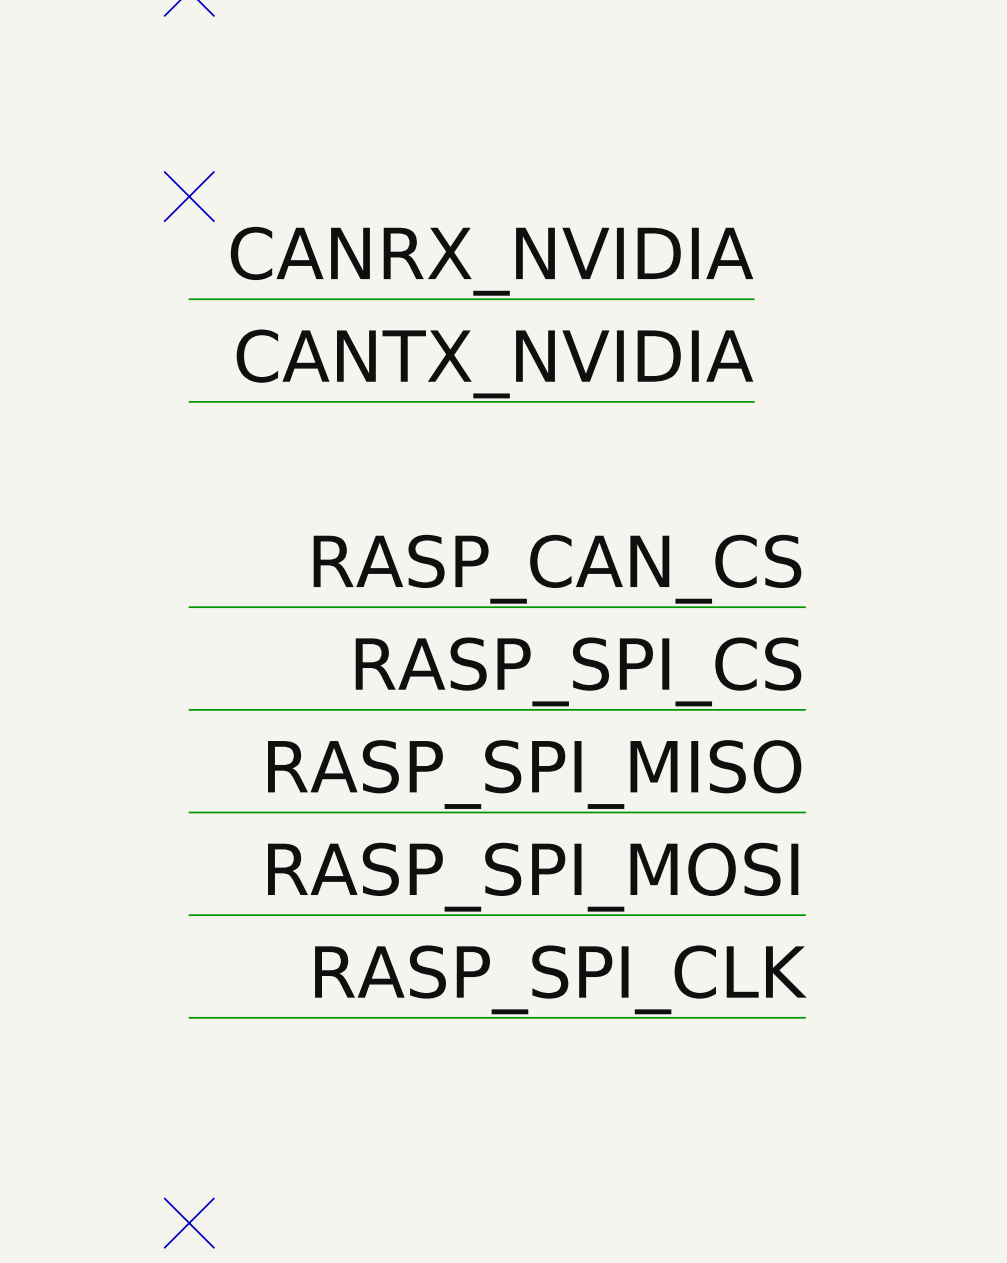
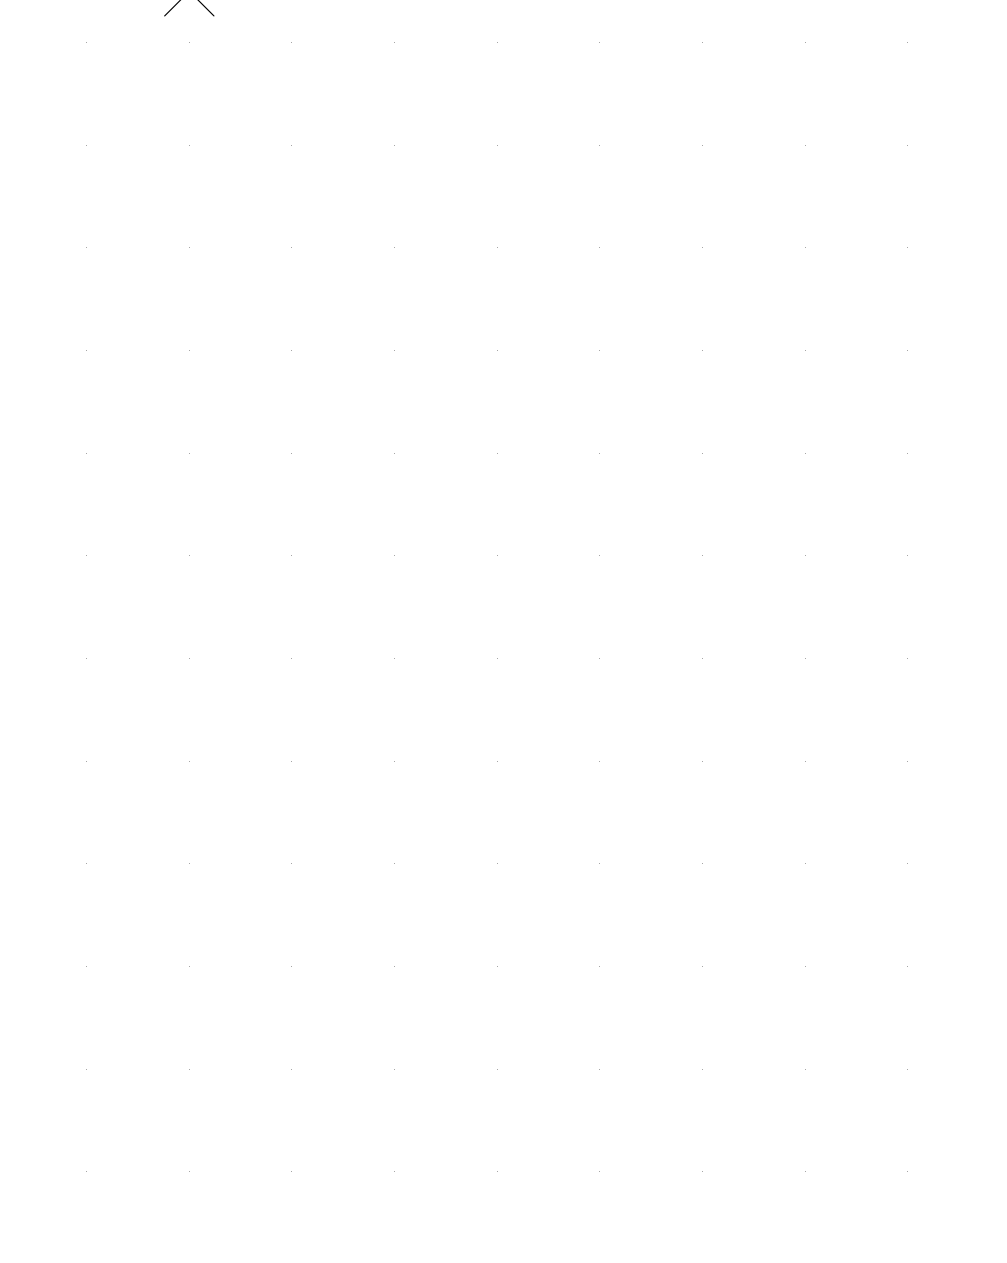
no-connect mark: (189, 196) -> none
label: CANRX_NVIDIA (492, 261) -> none
wire: (189, 299) (753, 299) -> none
label: CANTX_NVIDIA (495, 363) -> none
wire: (189, 401) (753, 401) -> none
label: RASP_CAN_CS (557, 569) -> none
wire: (189, 607) (805, 607) -> none
label: RASP_SPI_CS (578, 671) -> none
wire: (189, 709) (805, 709) -> none
label: RASP_SPI_MISO (534, 774) -> none
wire: (189, 812) (805, 812) -> none
label: RASP_SPI_MOSI (533, 877) -> none
wire: (189, 915) (805, 915) -> none
label: RASP_SPI_CLK (560, 979) -> none
wire: (189, 1017) (805, 1017) -> none
no-connect mark: (189, 1223) -> none

